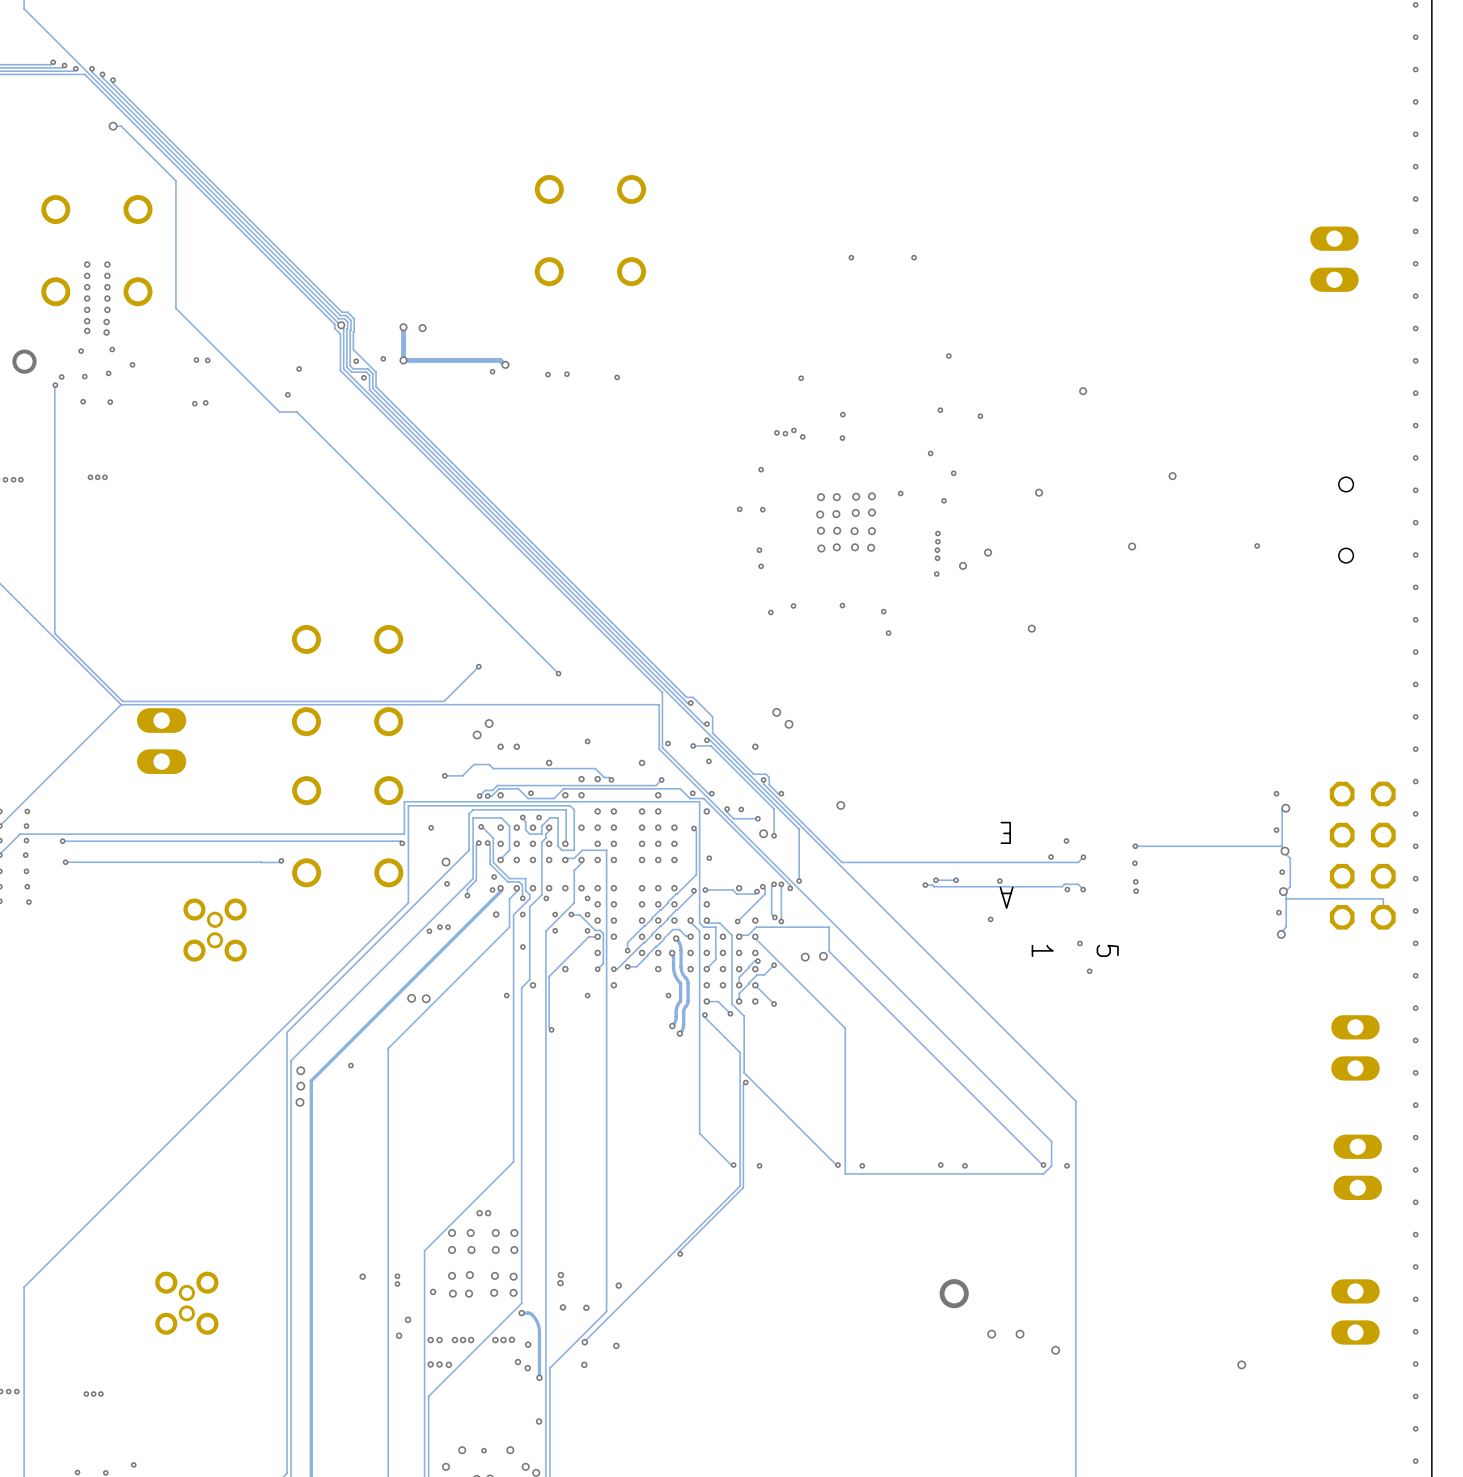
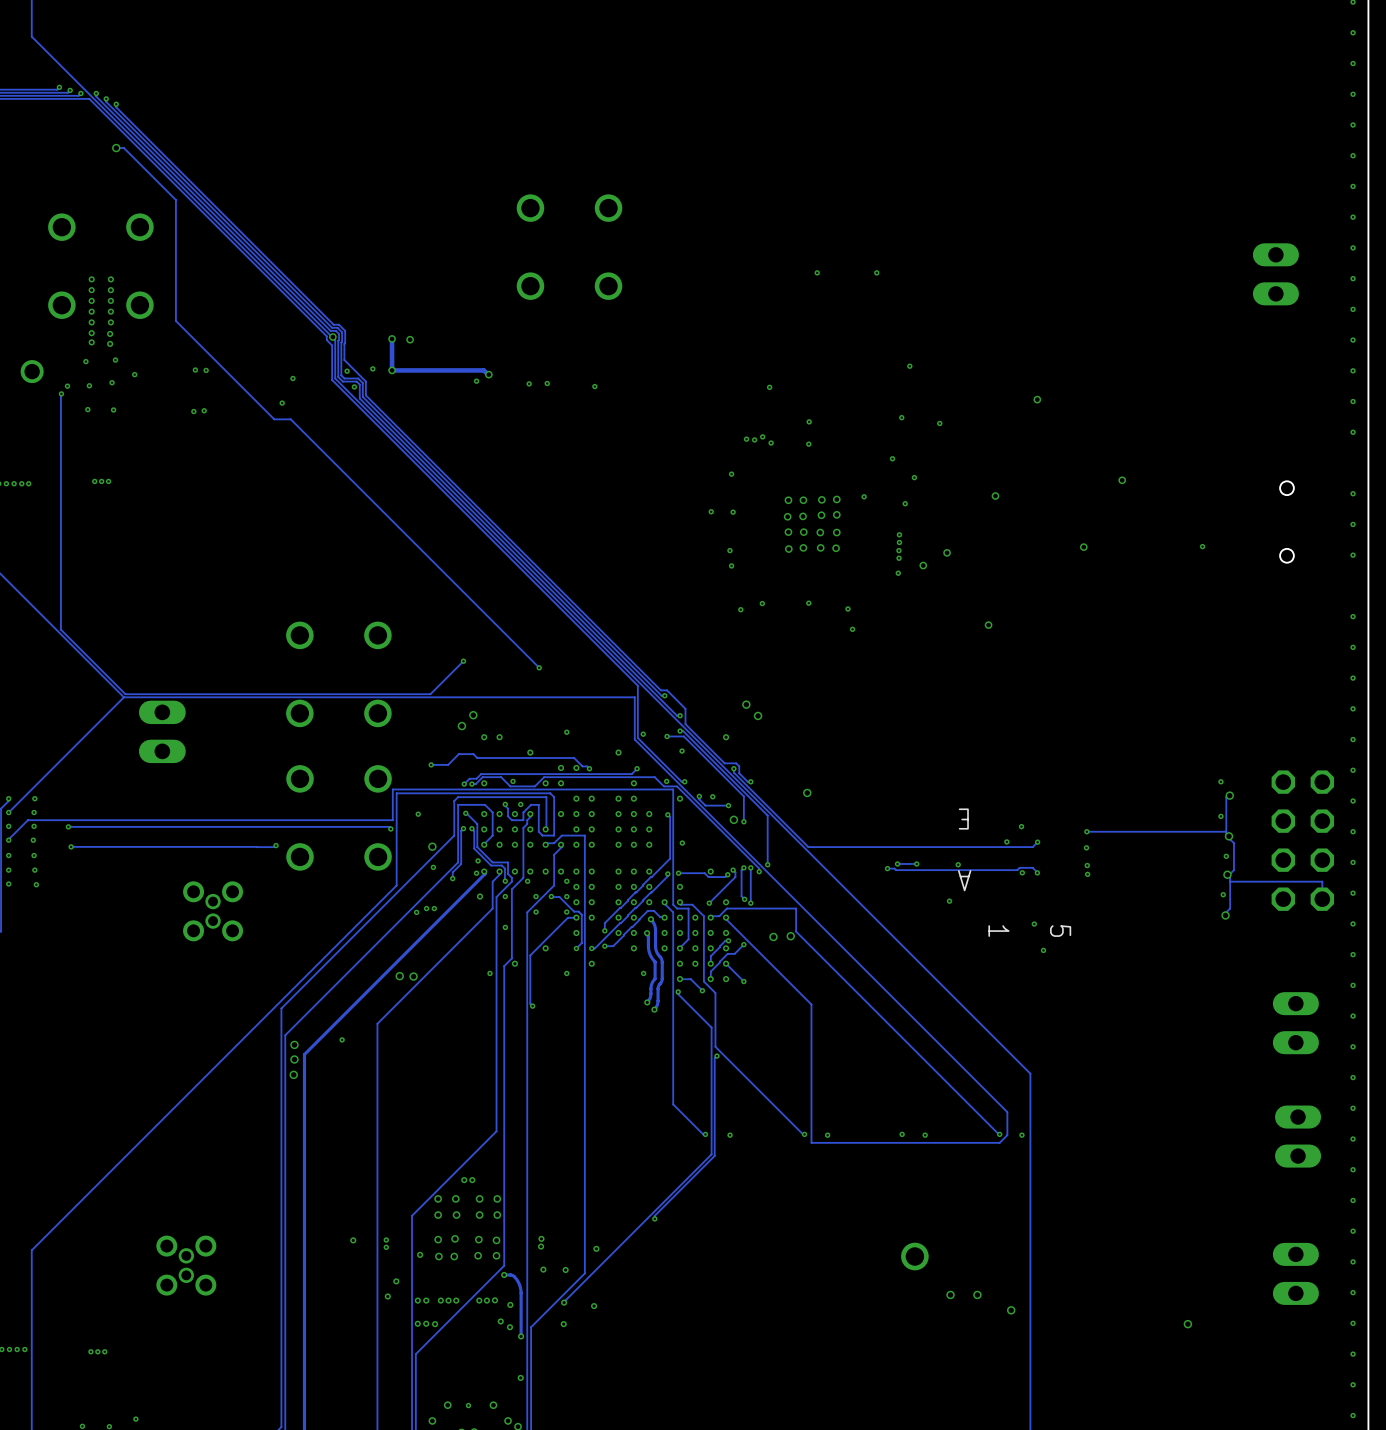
via: (1415, 457) -> none
via: (1415, 587) -> none

